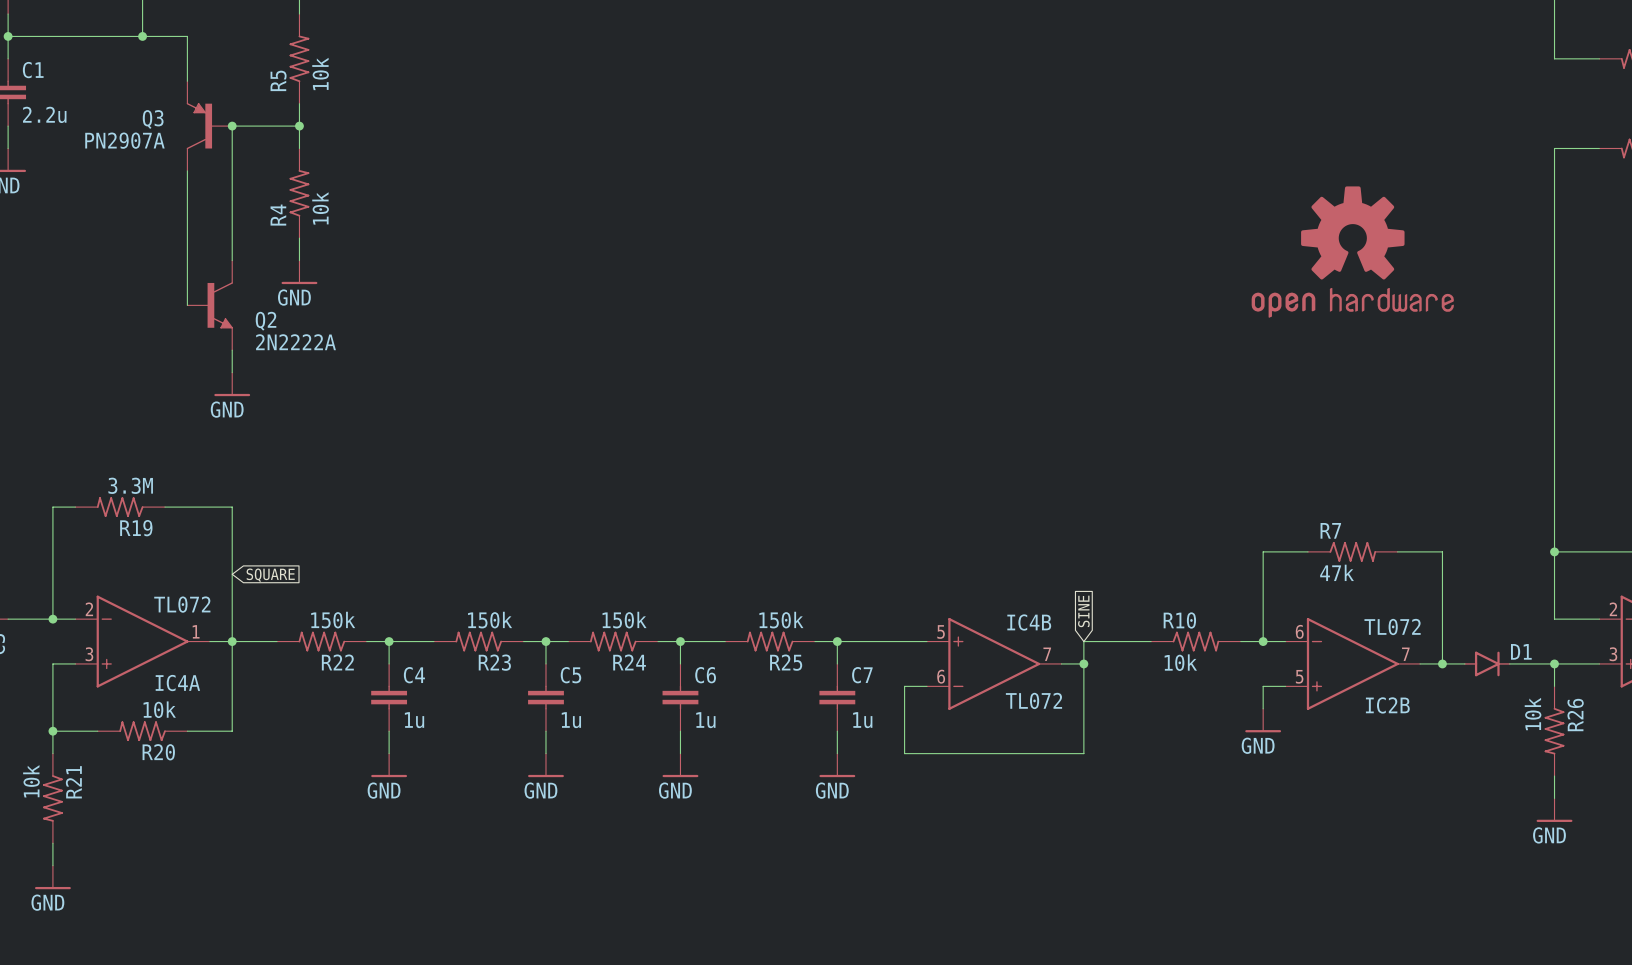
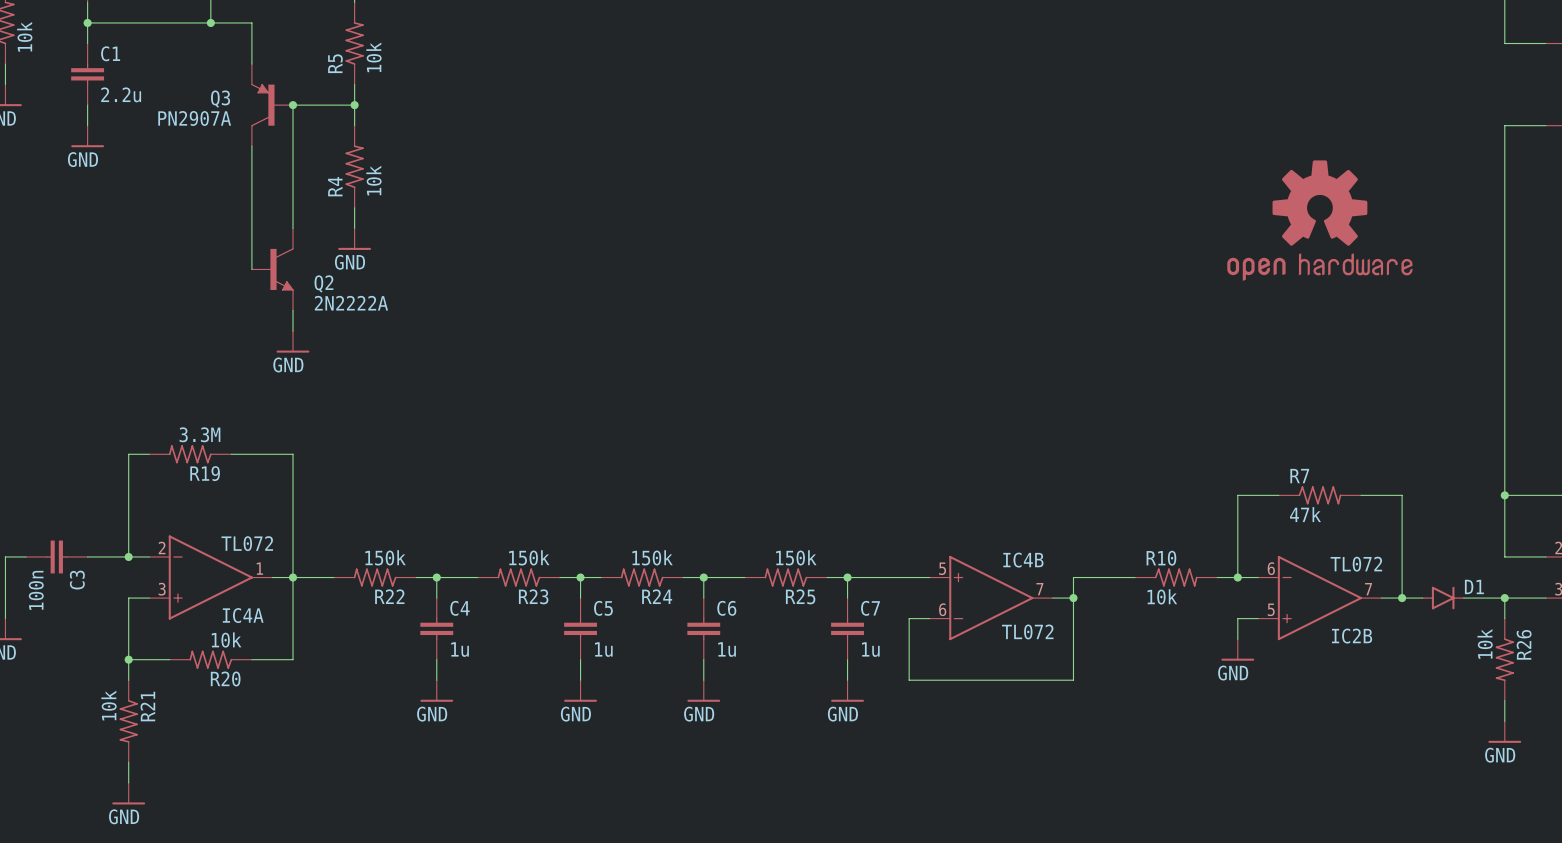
global label: SQUARE (270, 575) -> none
global label: SINE (1083, 611) -> none

